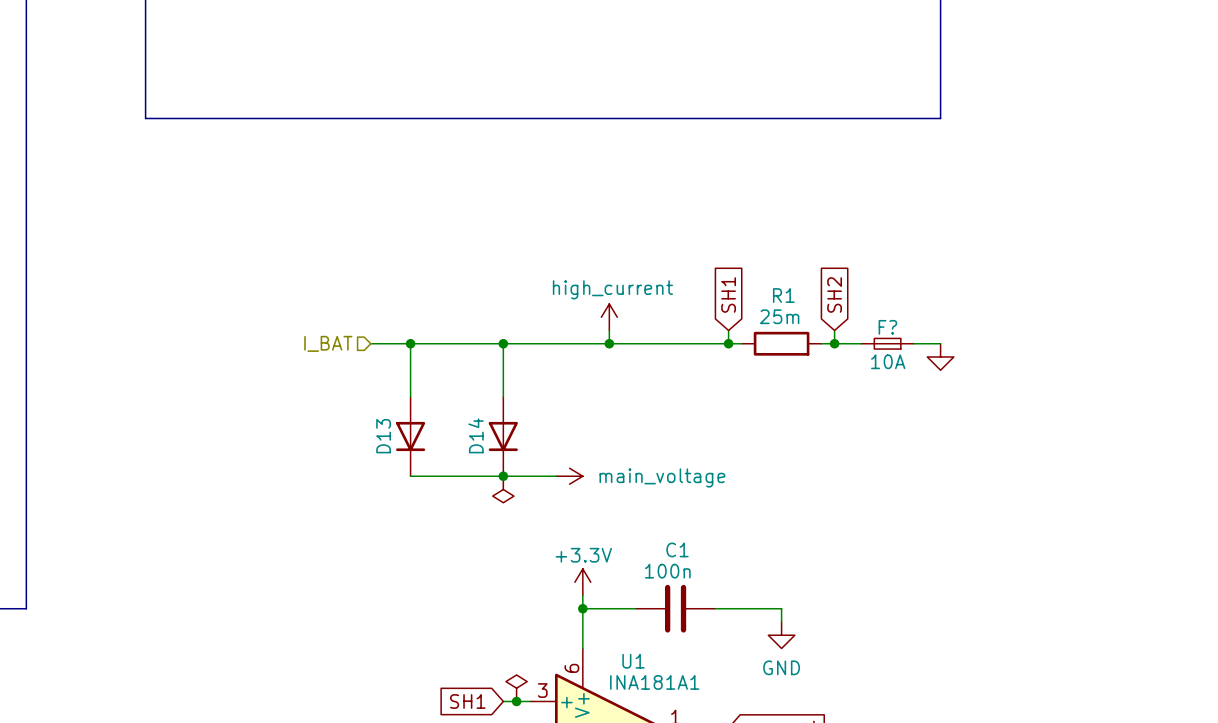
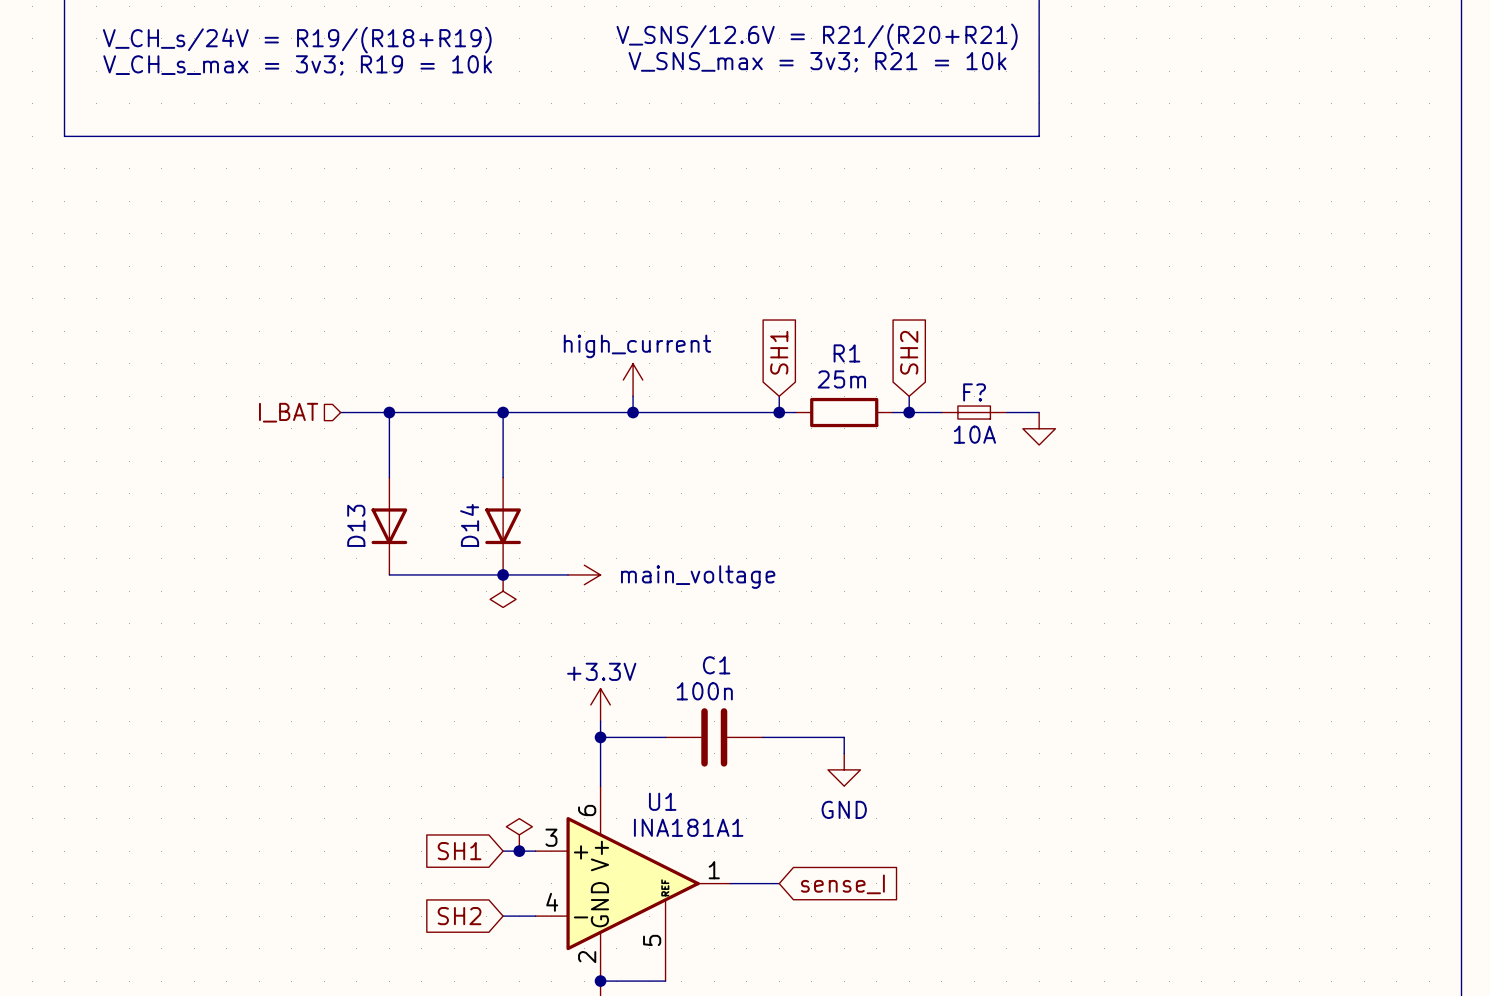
text: none -> V_SNS/12.6V = R21/(R20+R21) (817, 36)
text: none -> V_CH_s/24V = R19/(R18+R19) (297, 40)
text: none -> V_SNS_max = 3v3; R21 = 10k (817, 62)
text: none -> V_CH_s_max = 3v3; R19 = 10k (297, 65)

